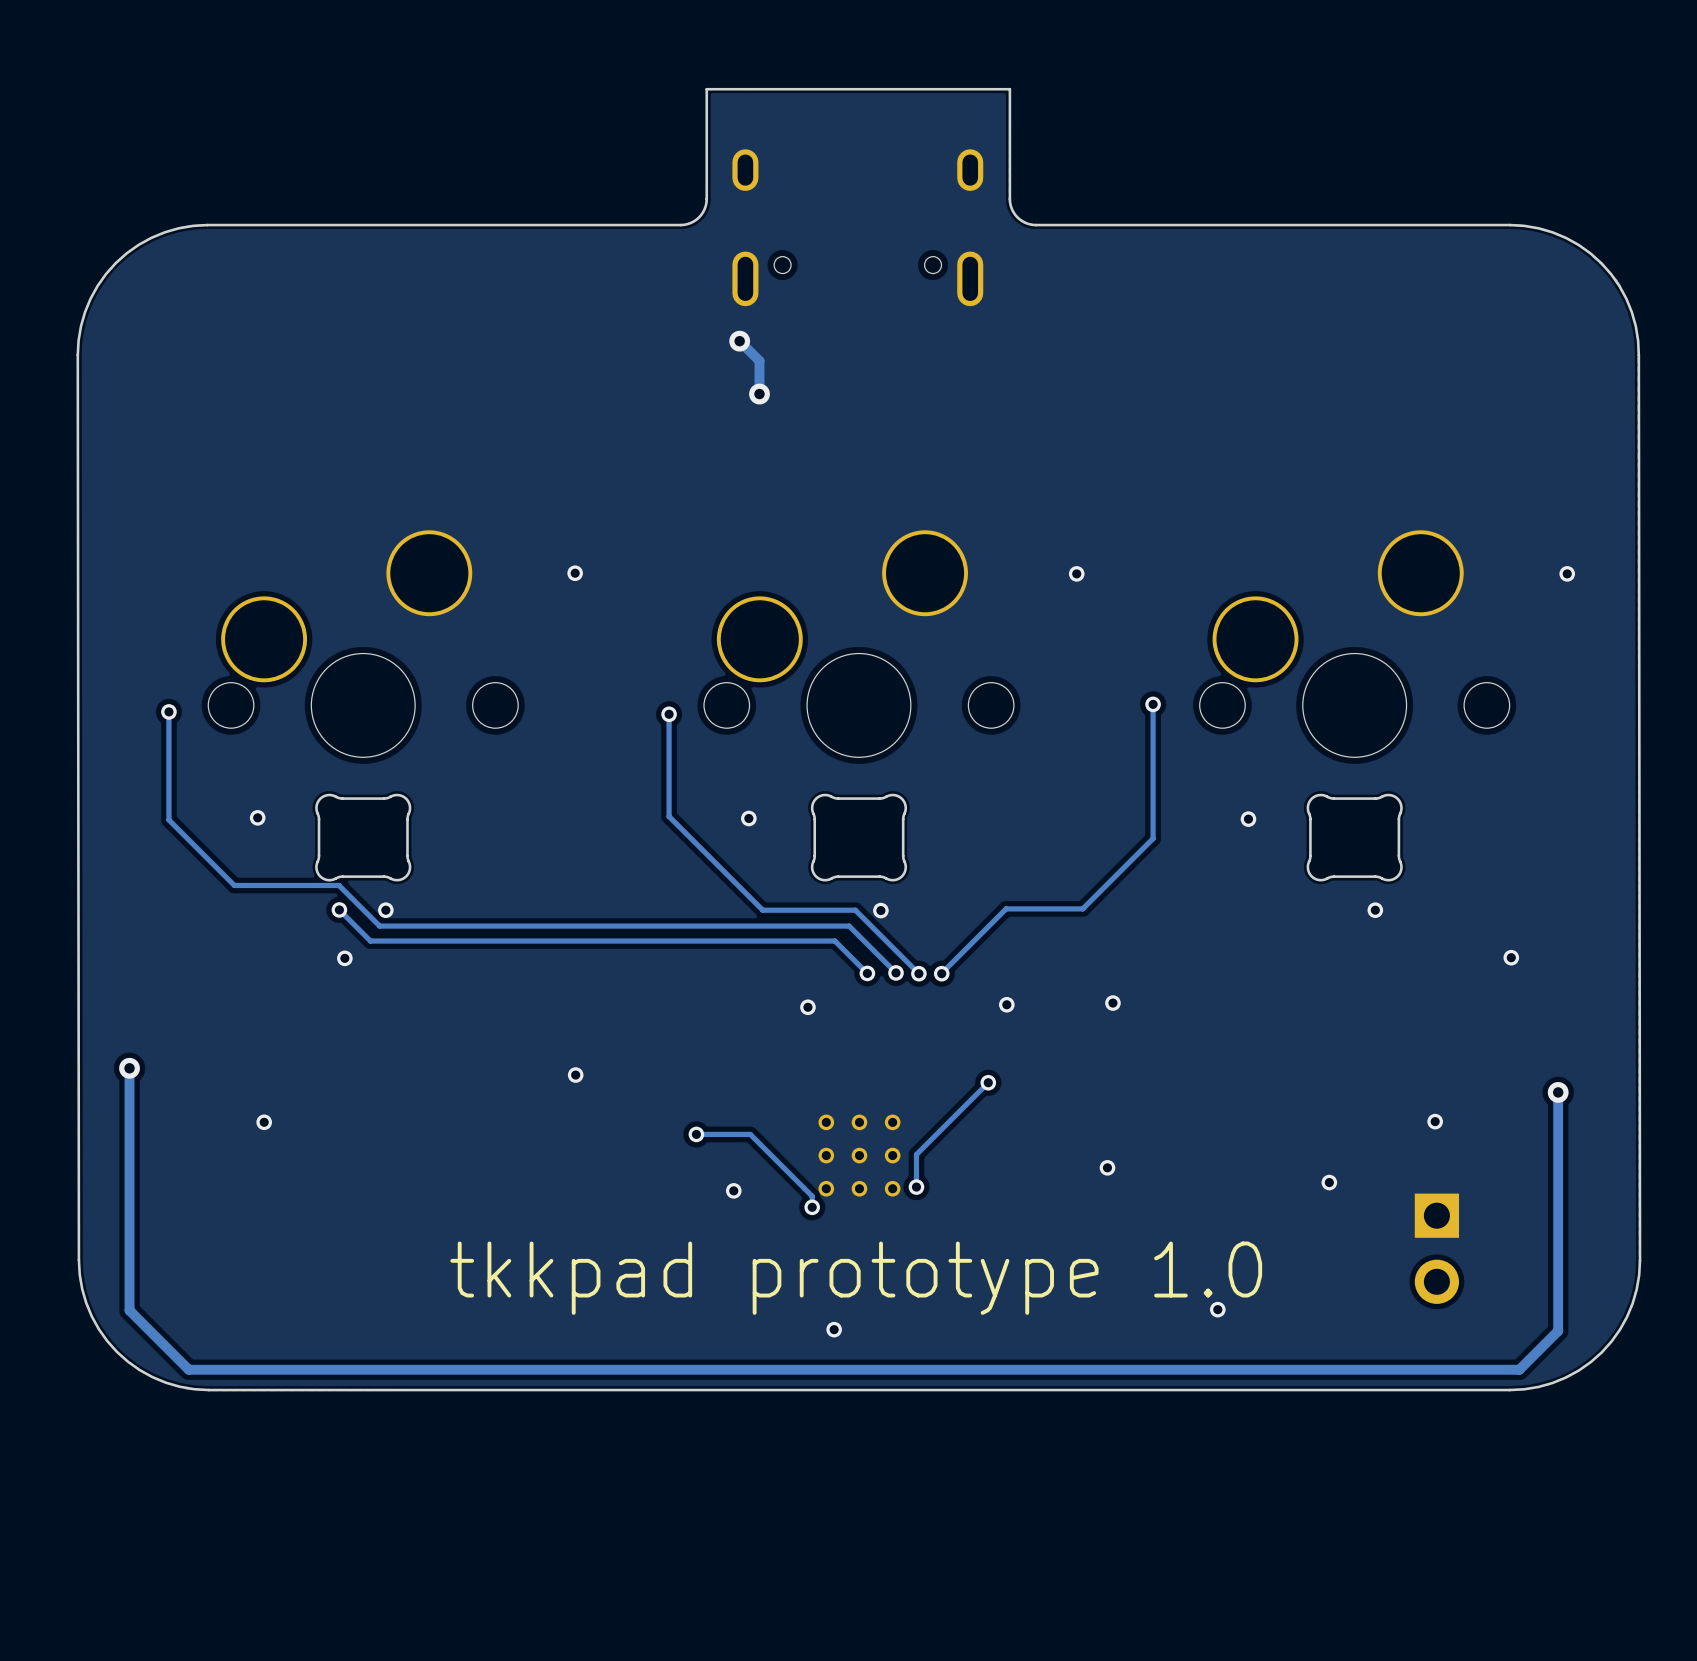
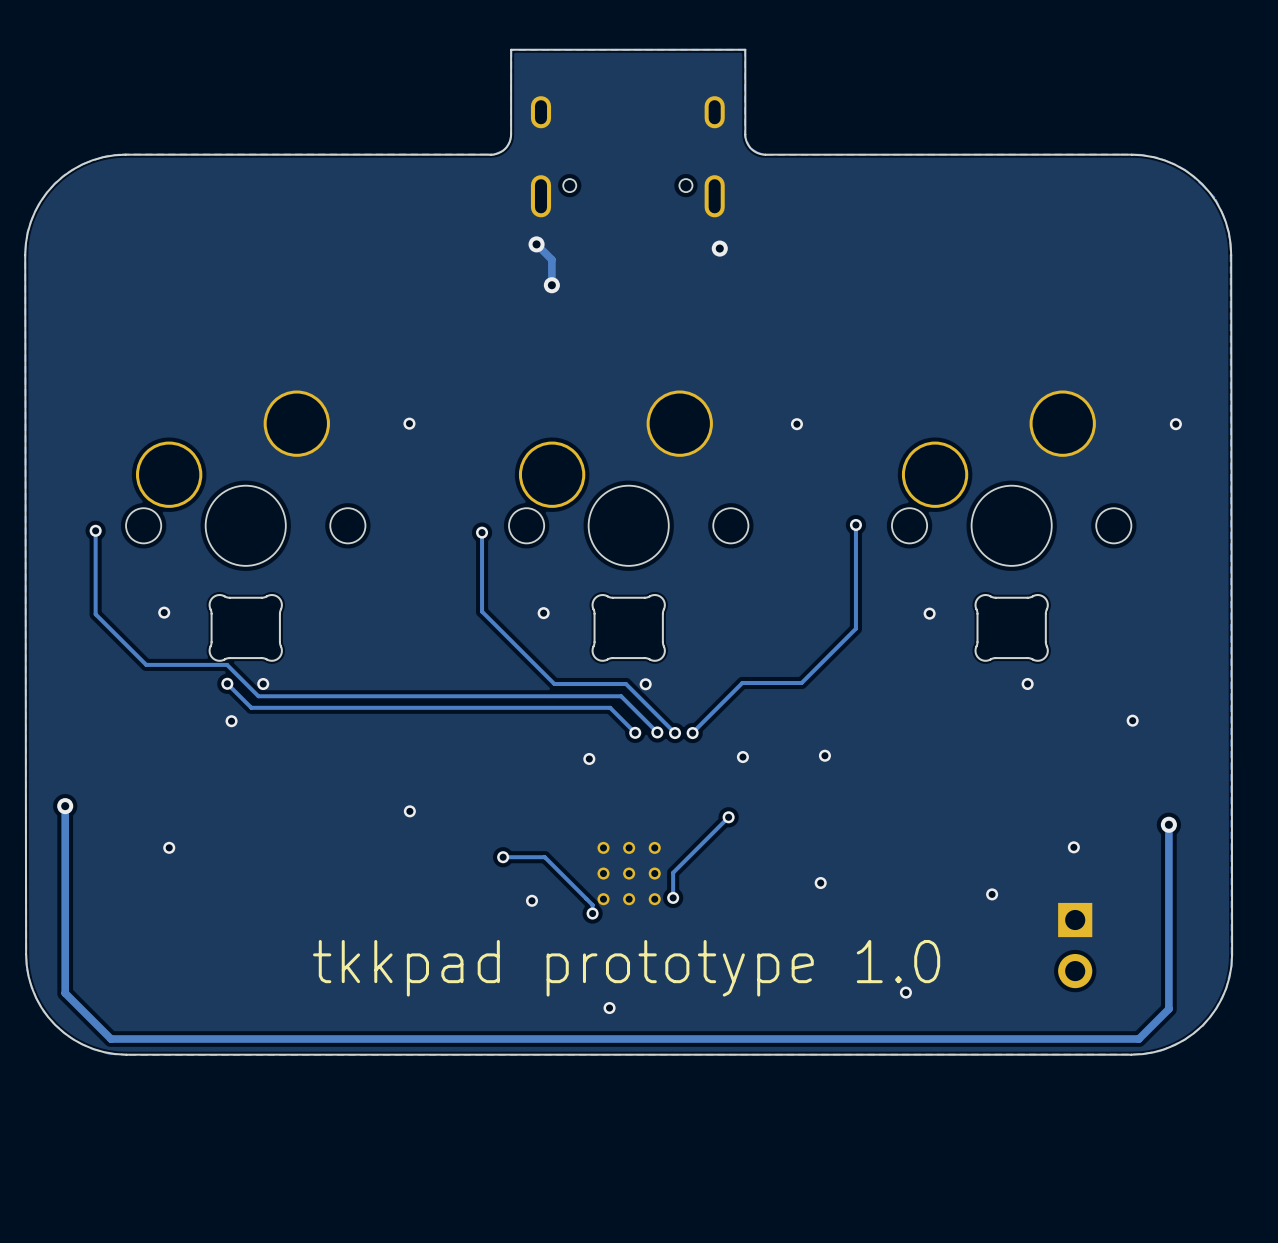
via: none -> (719, 248)

